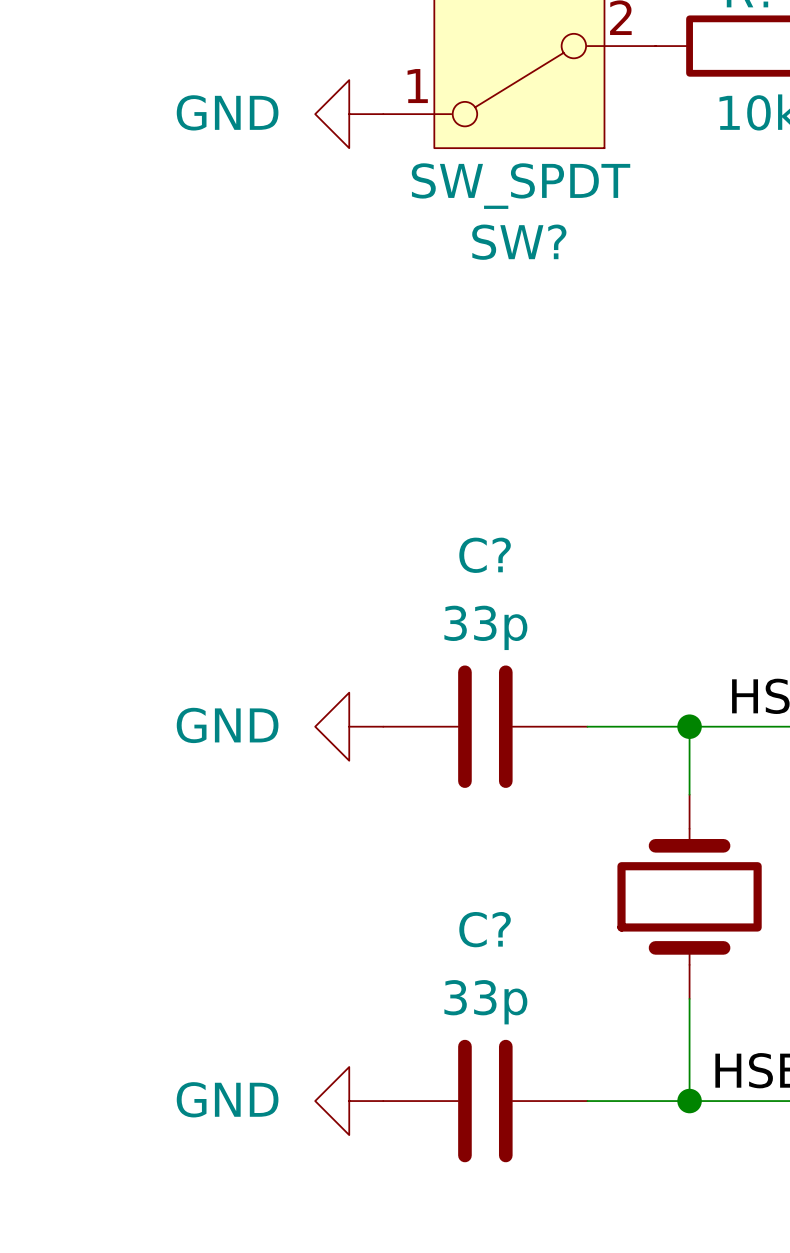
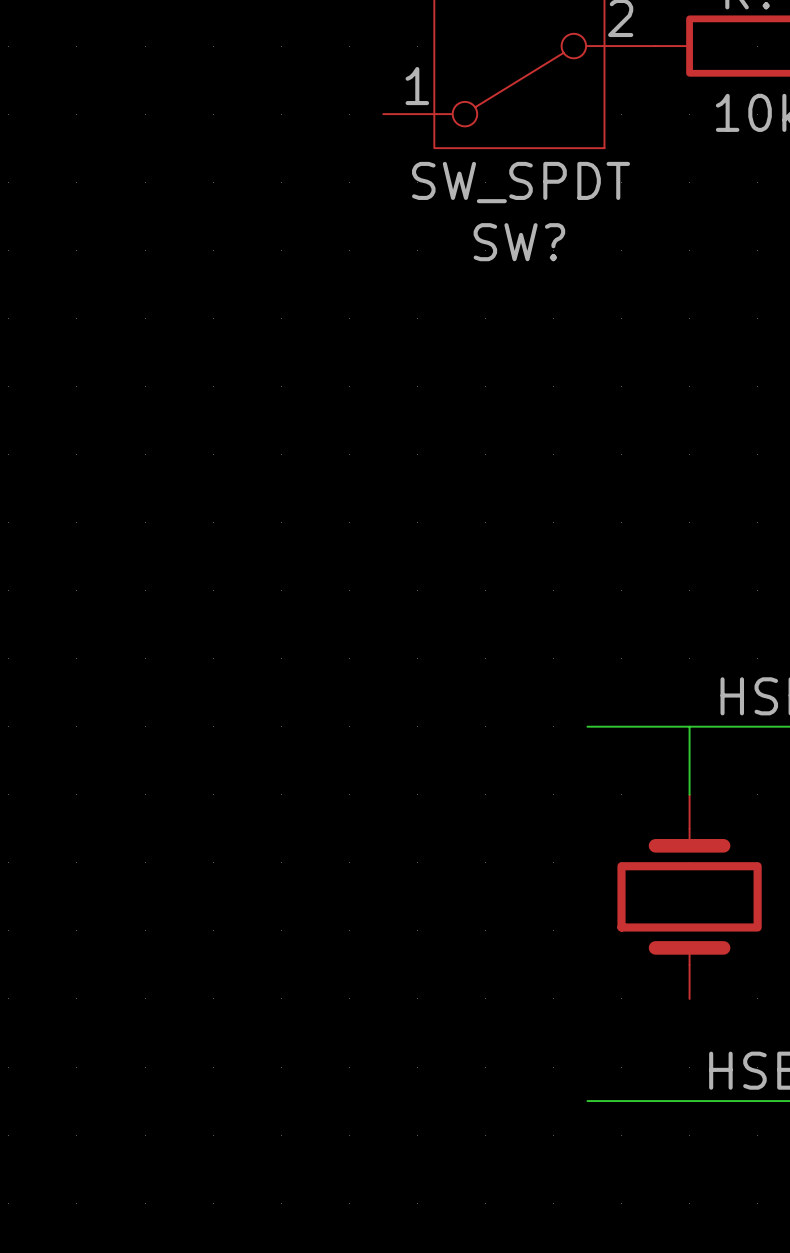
power symbol: GND (349, 114) -> none
power symbol: GND (349, 726) -> none
C?: 33p (485, 726) -> none
junction: (689, 726) -> none
wire: (689, 998) (689, 1101) -> none
power symbol: GND (349, 1101) -> none
C?: 33p (485, 1101) -> none
junction: (689, 1101) -> none

